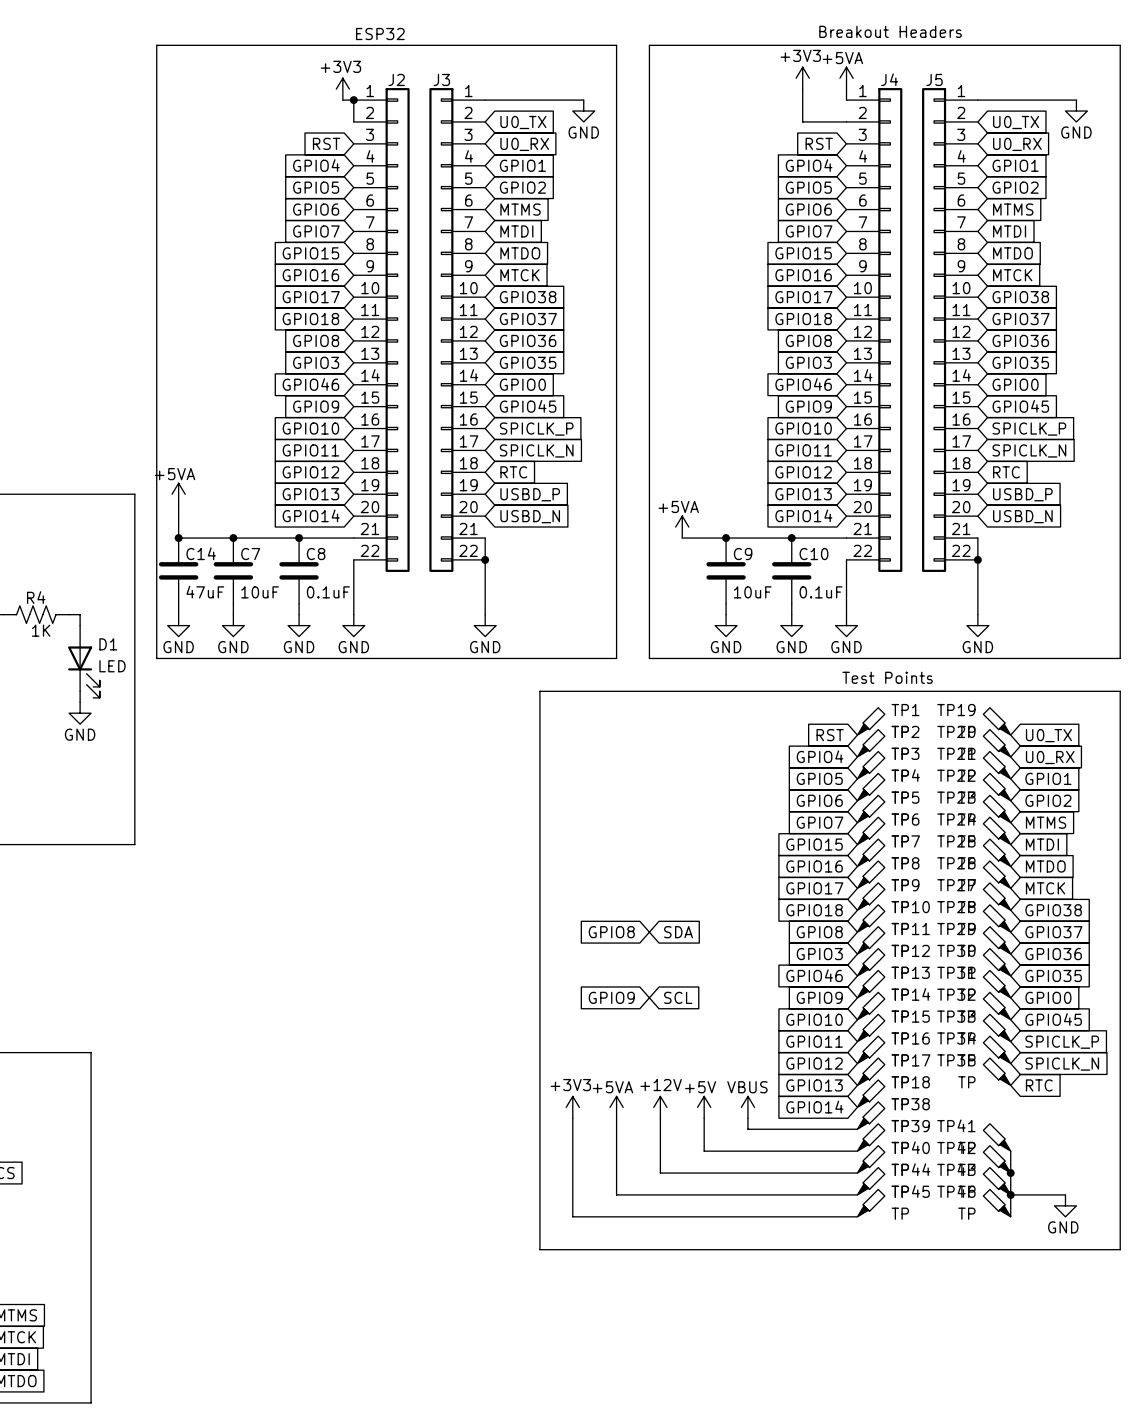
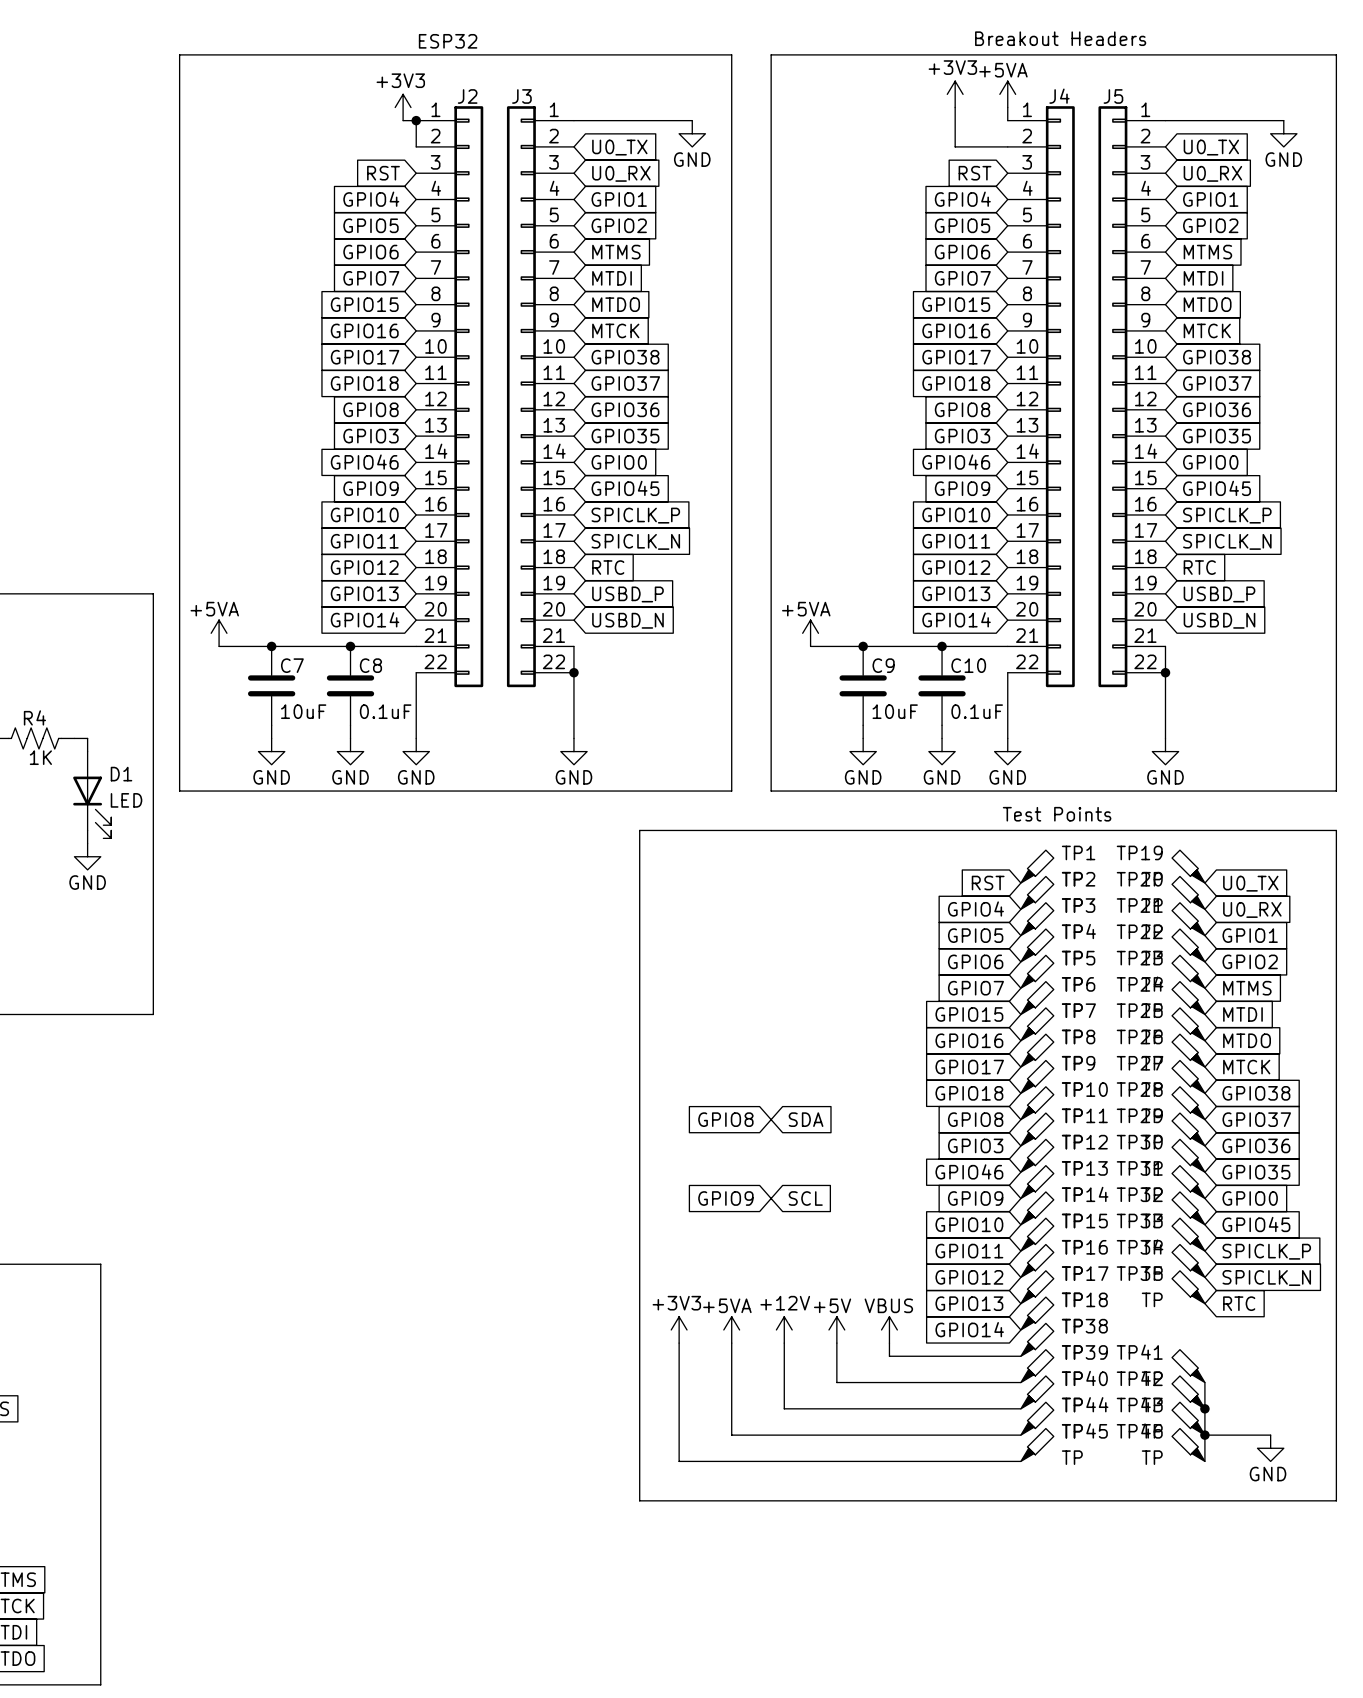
power symbol position: +5VA (178, 494) -> +5VA (219, 633)
wire: (178, 505) (178, 538) (189, 538) -> none
junction: (178, 538) -> none
C14: 47uF (178, 570) -> none
wire: (178, 603) (178, 614) -> none
power symbol: GND (178, 625) -> none

